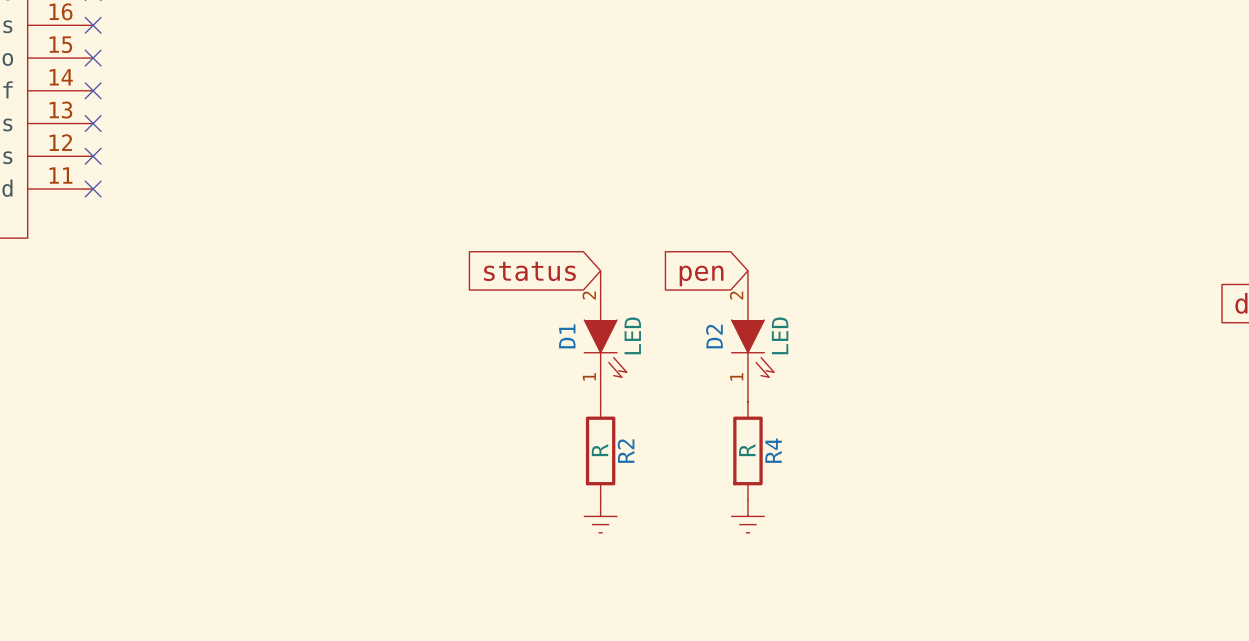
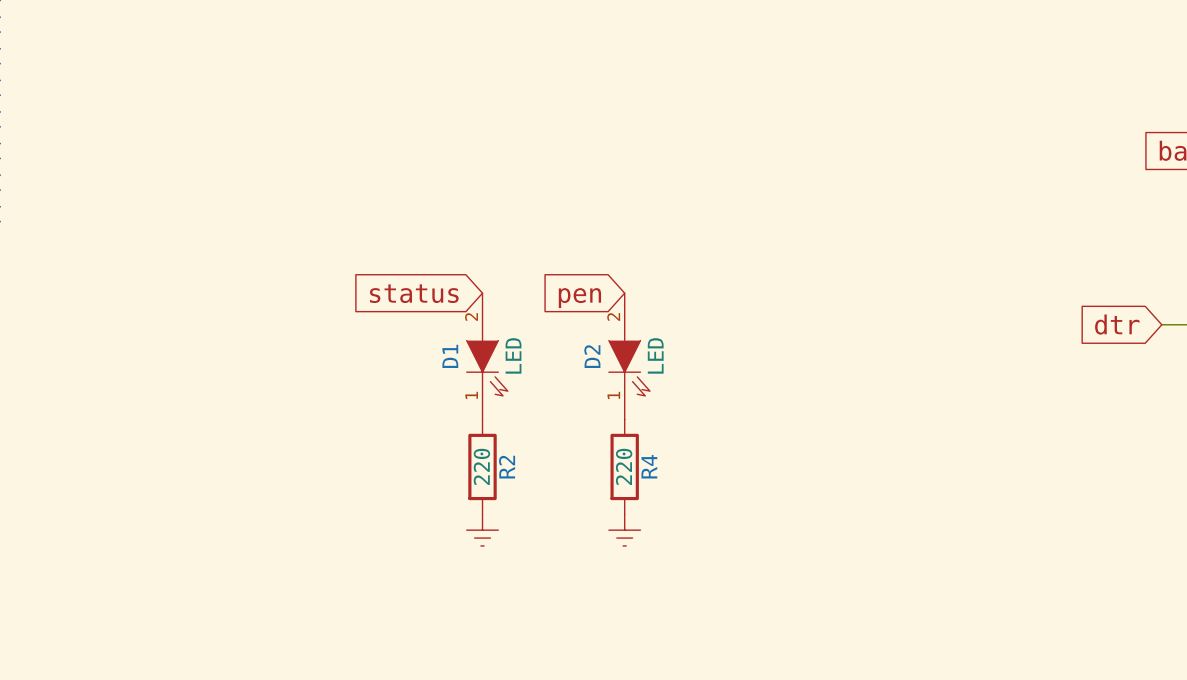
R2 value: R (600, 450) -> 220 (481, 466)
R4 value: R (747, 450) -> 220 (624, 466)

